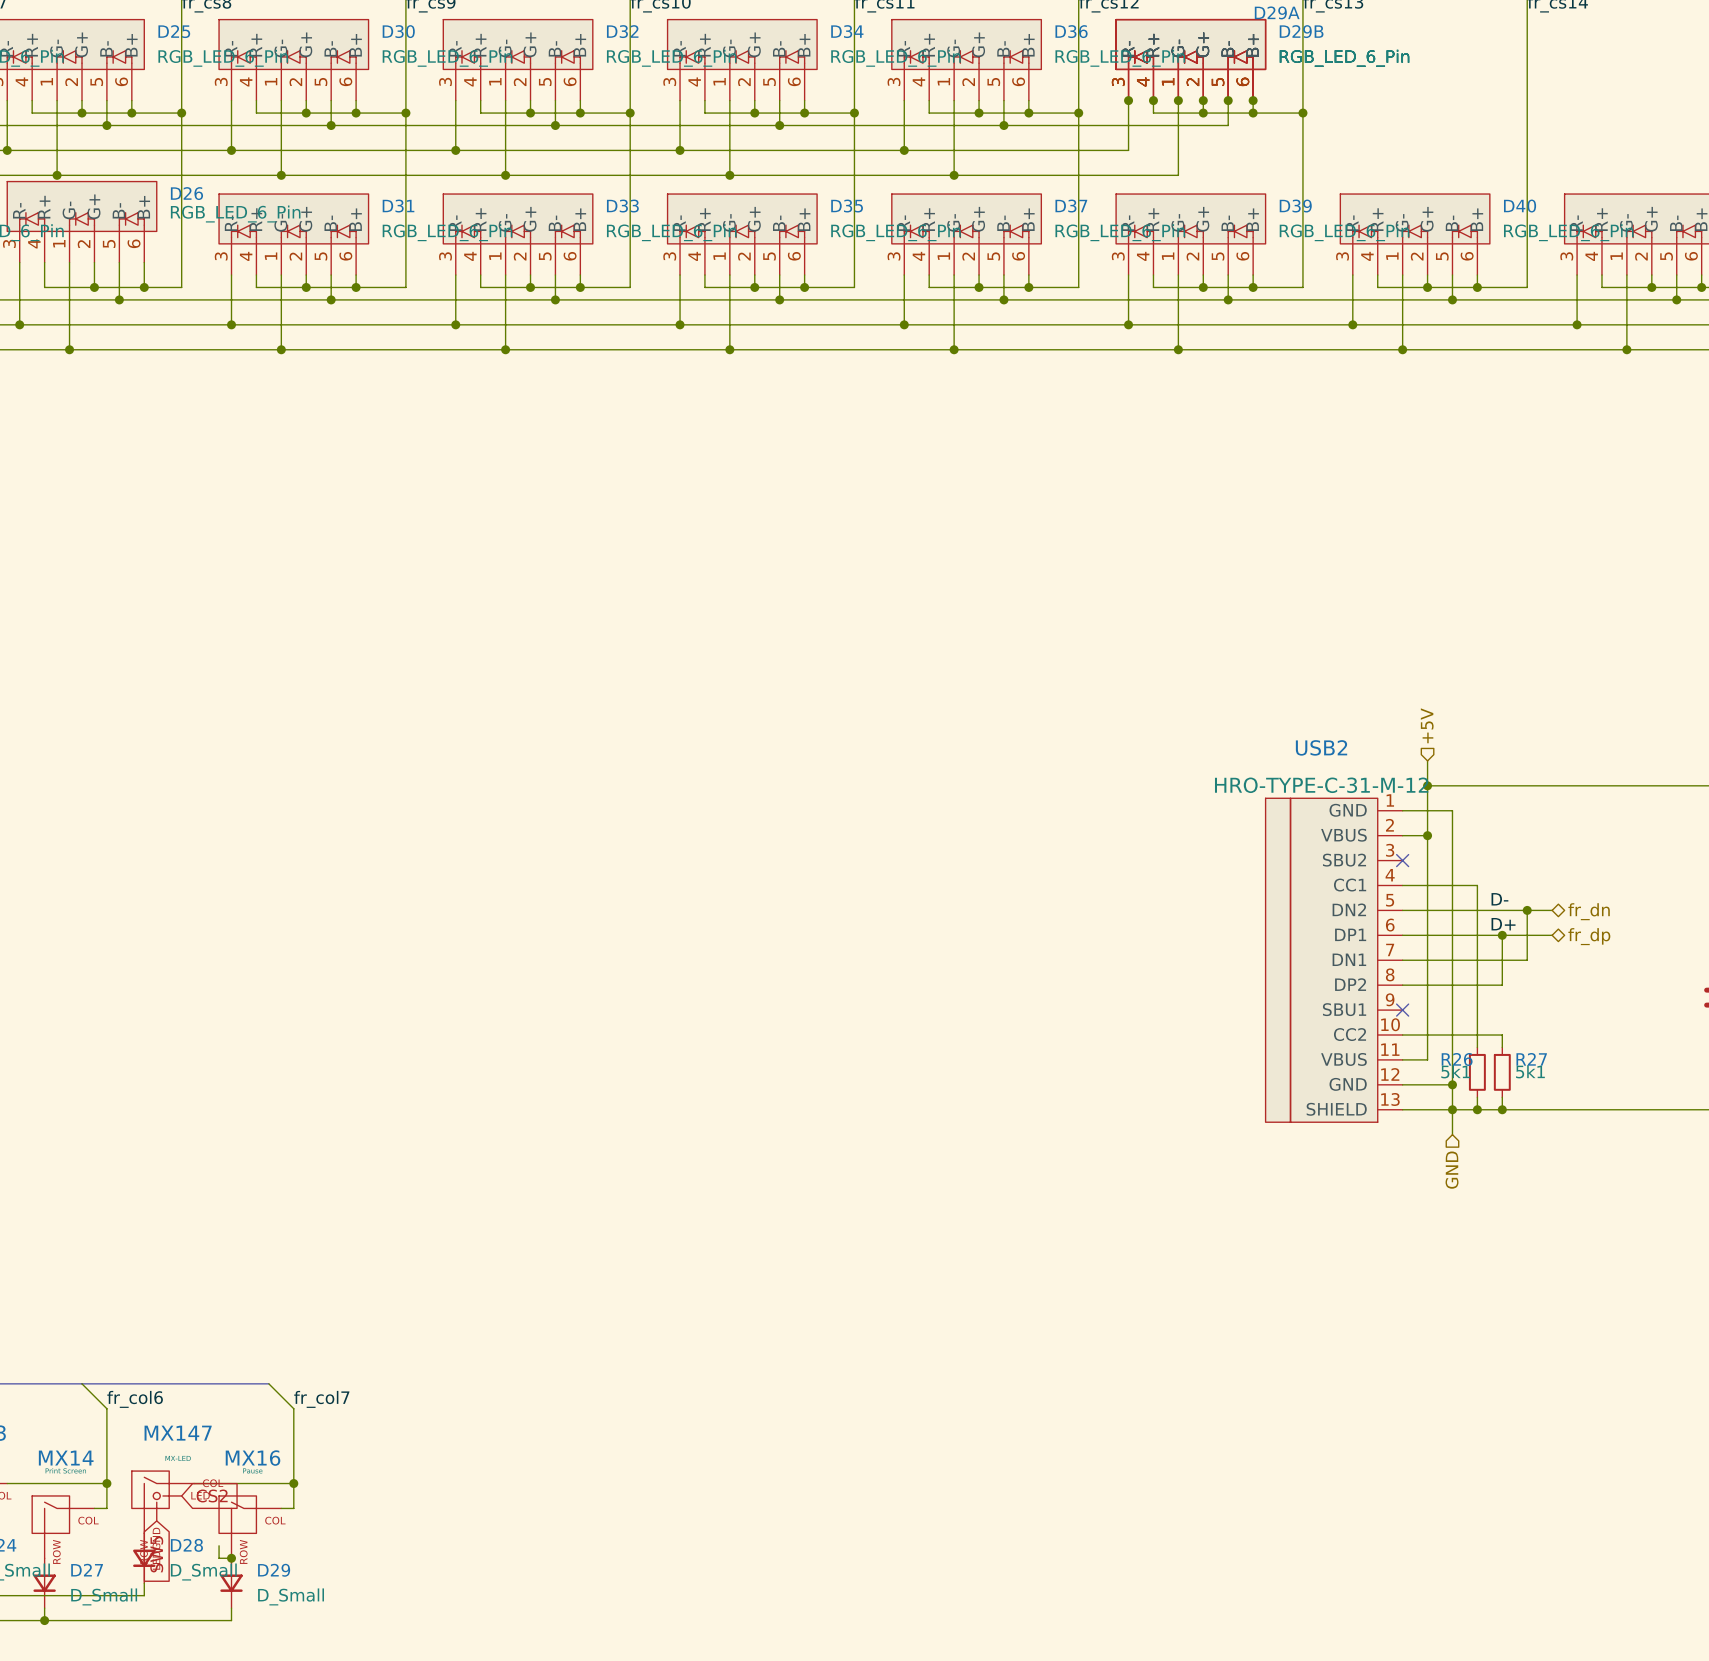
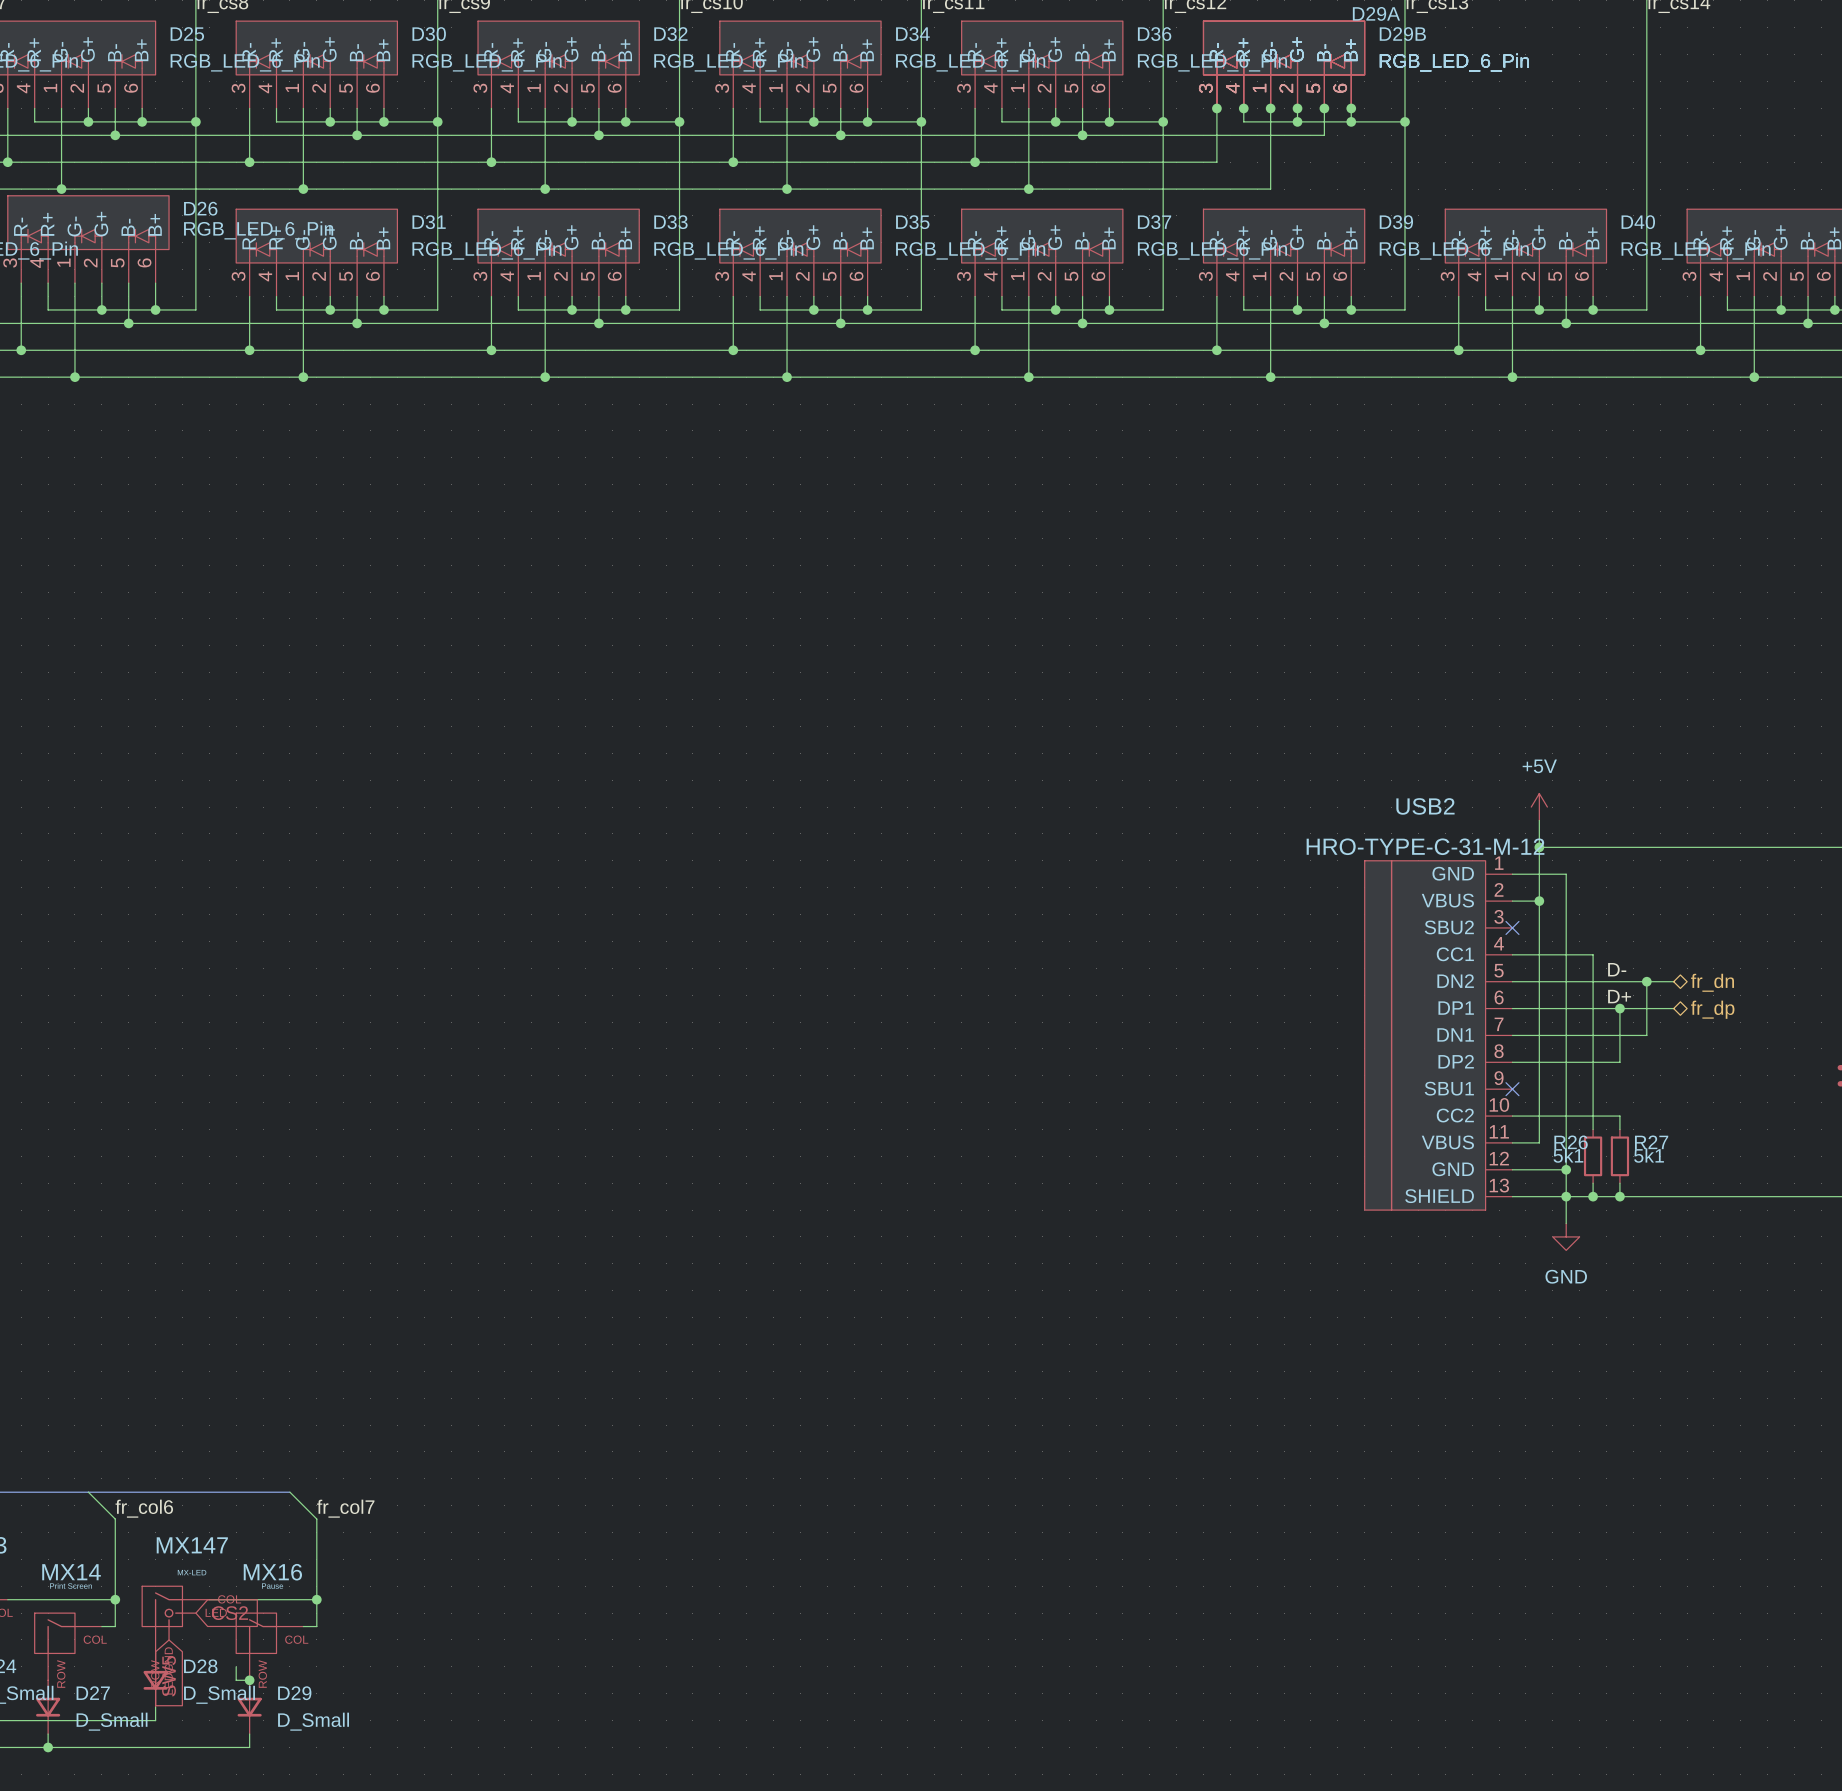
hierarchical label: +5V (1427, 725) -> none
power symbol: none -> +5V (1539, 807)
power symbol: none -> GND (1566, 1236)
hierarchical label: GND (1452, 1170) -> none

